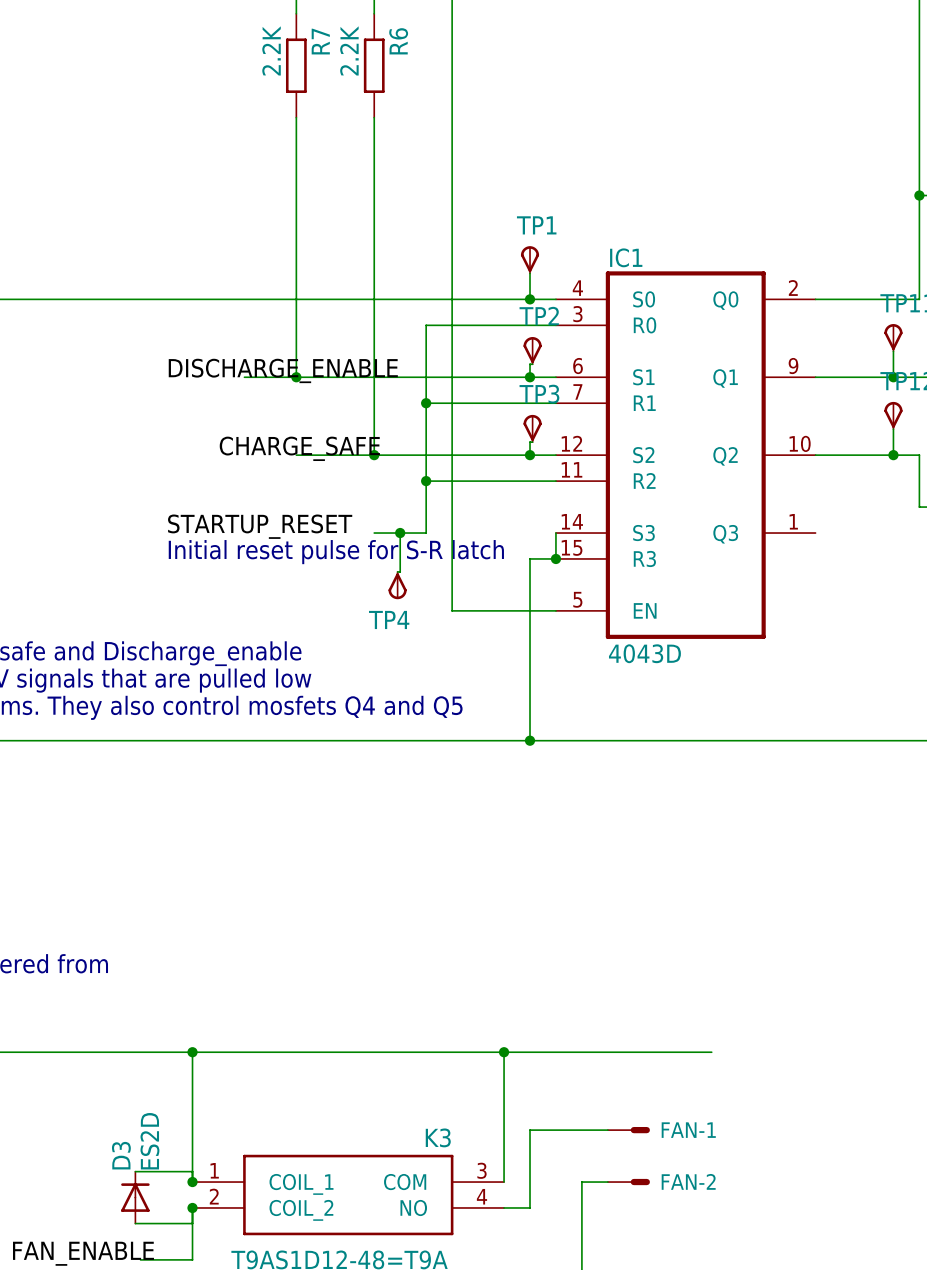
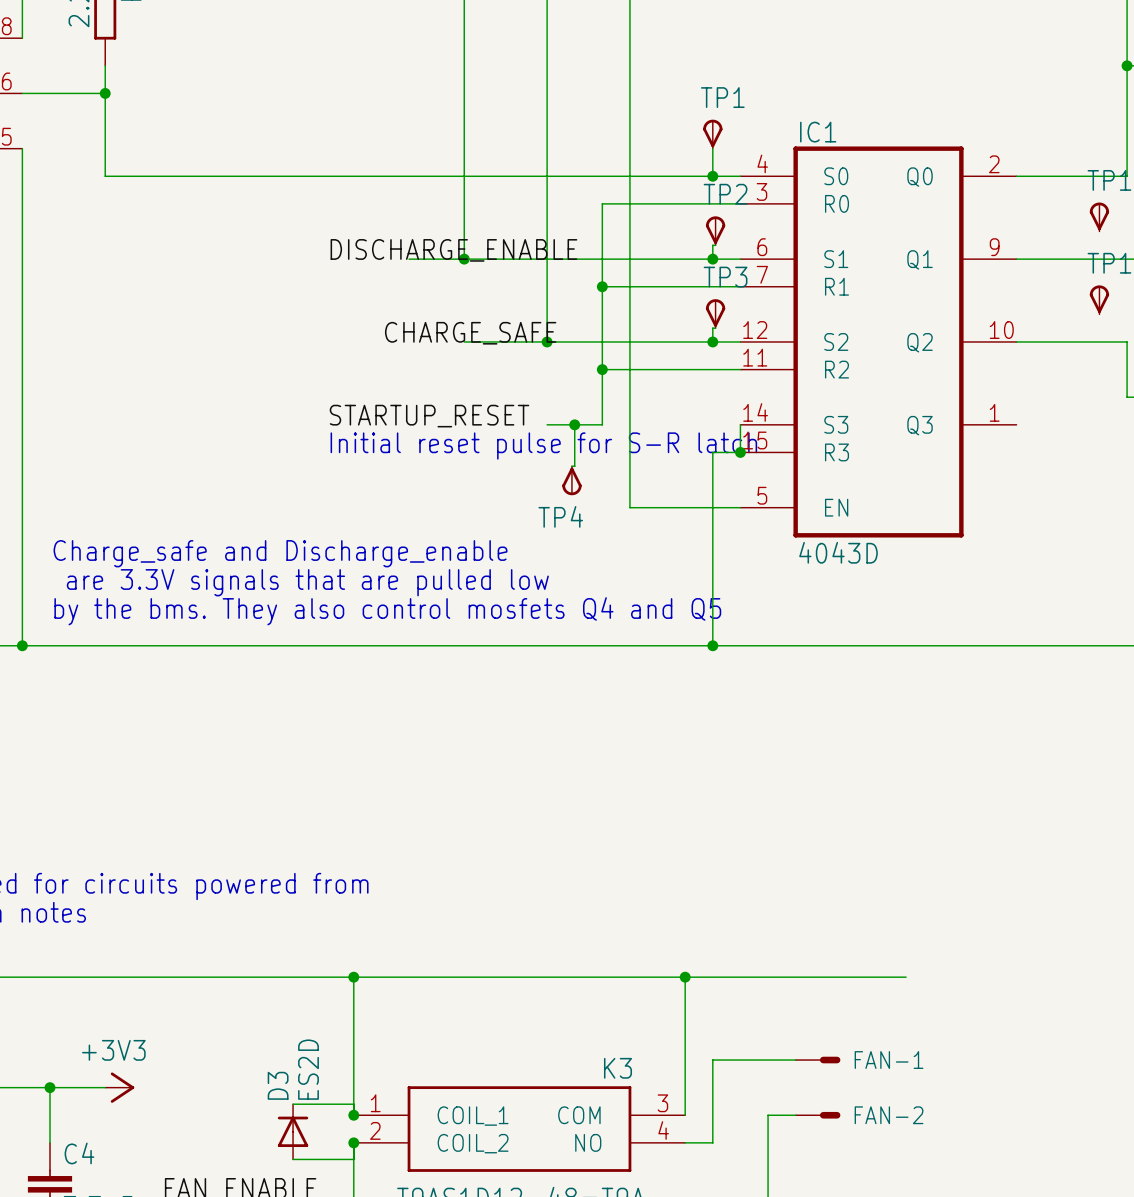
wire: (893, 351) (893, 377) -> none
junction: (893, 377) -> none
wire: (893, 429) (893, 455) -> none
junction: (893, 455) -> none

